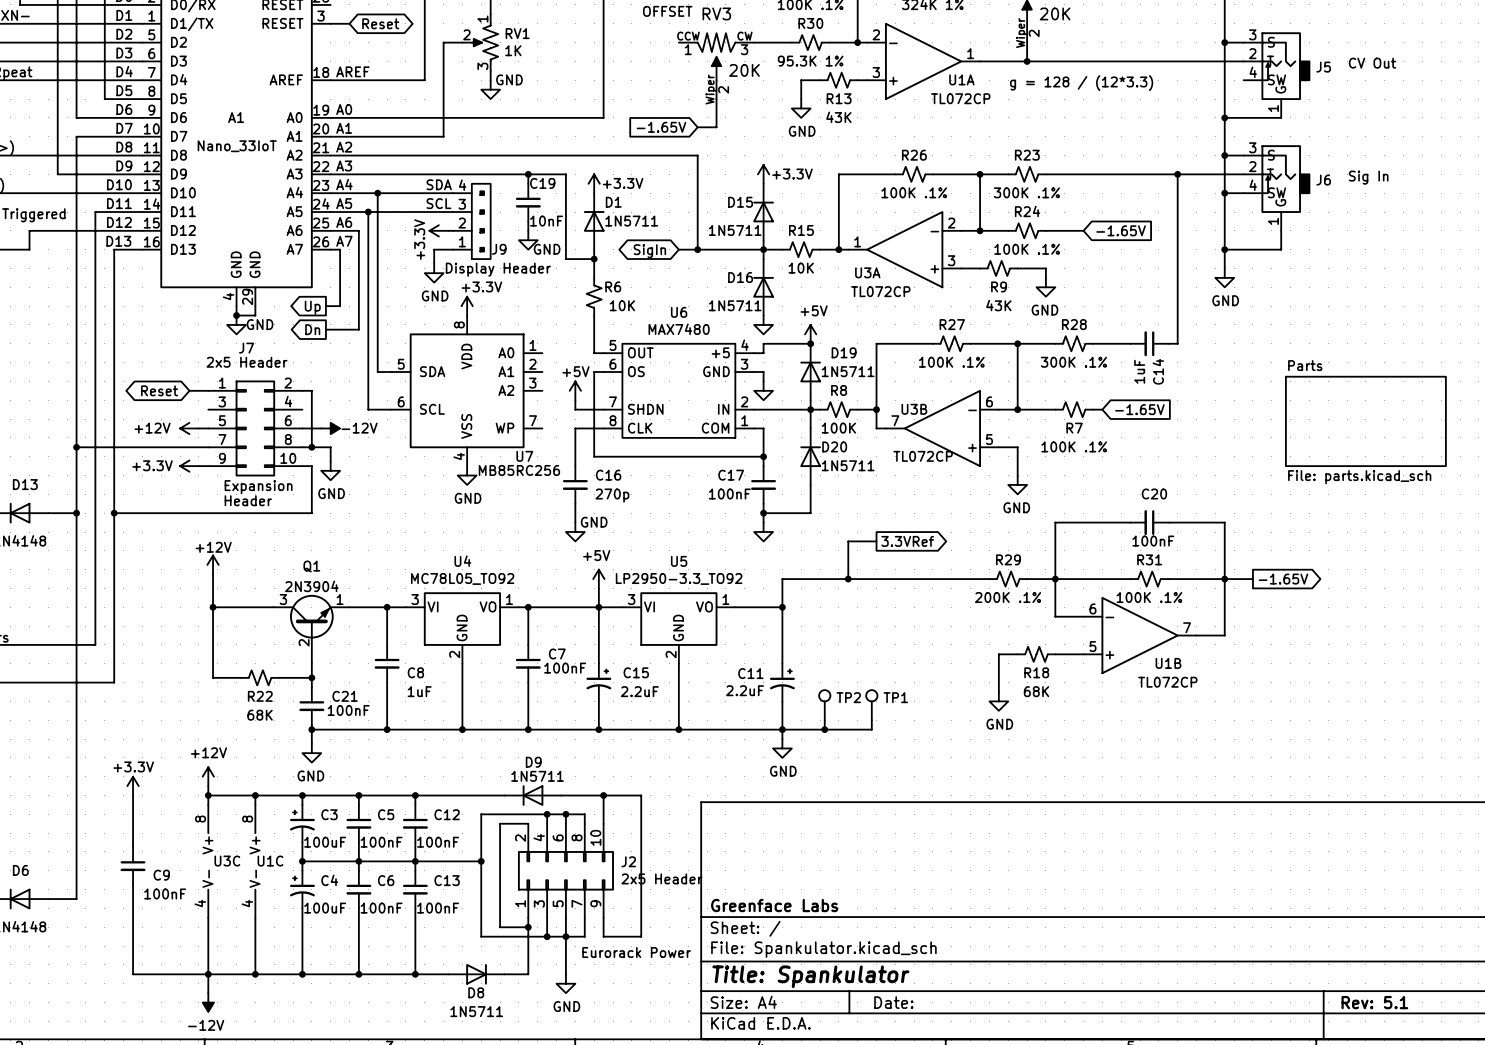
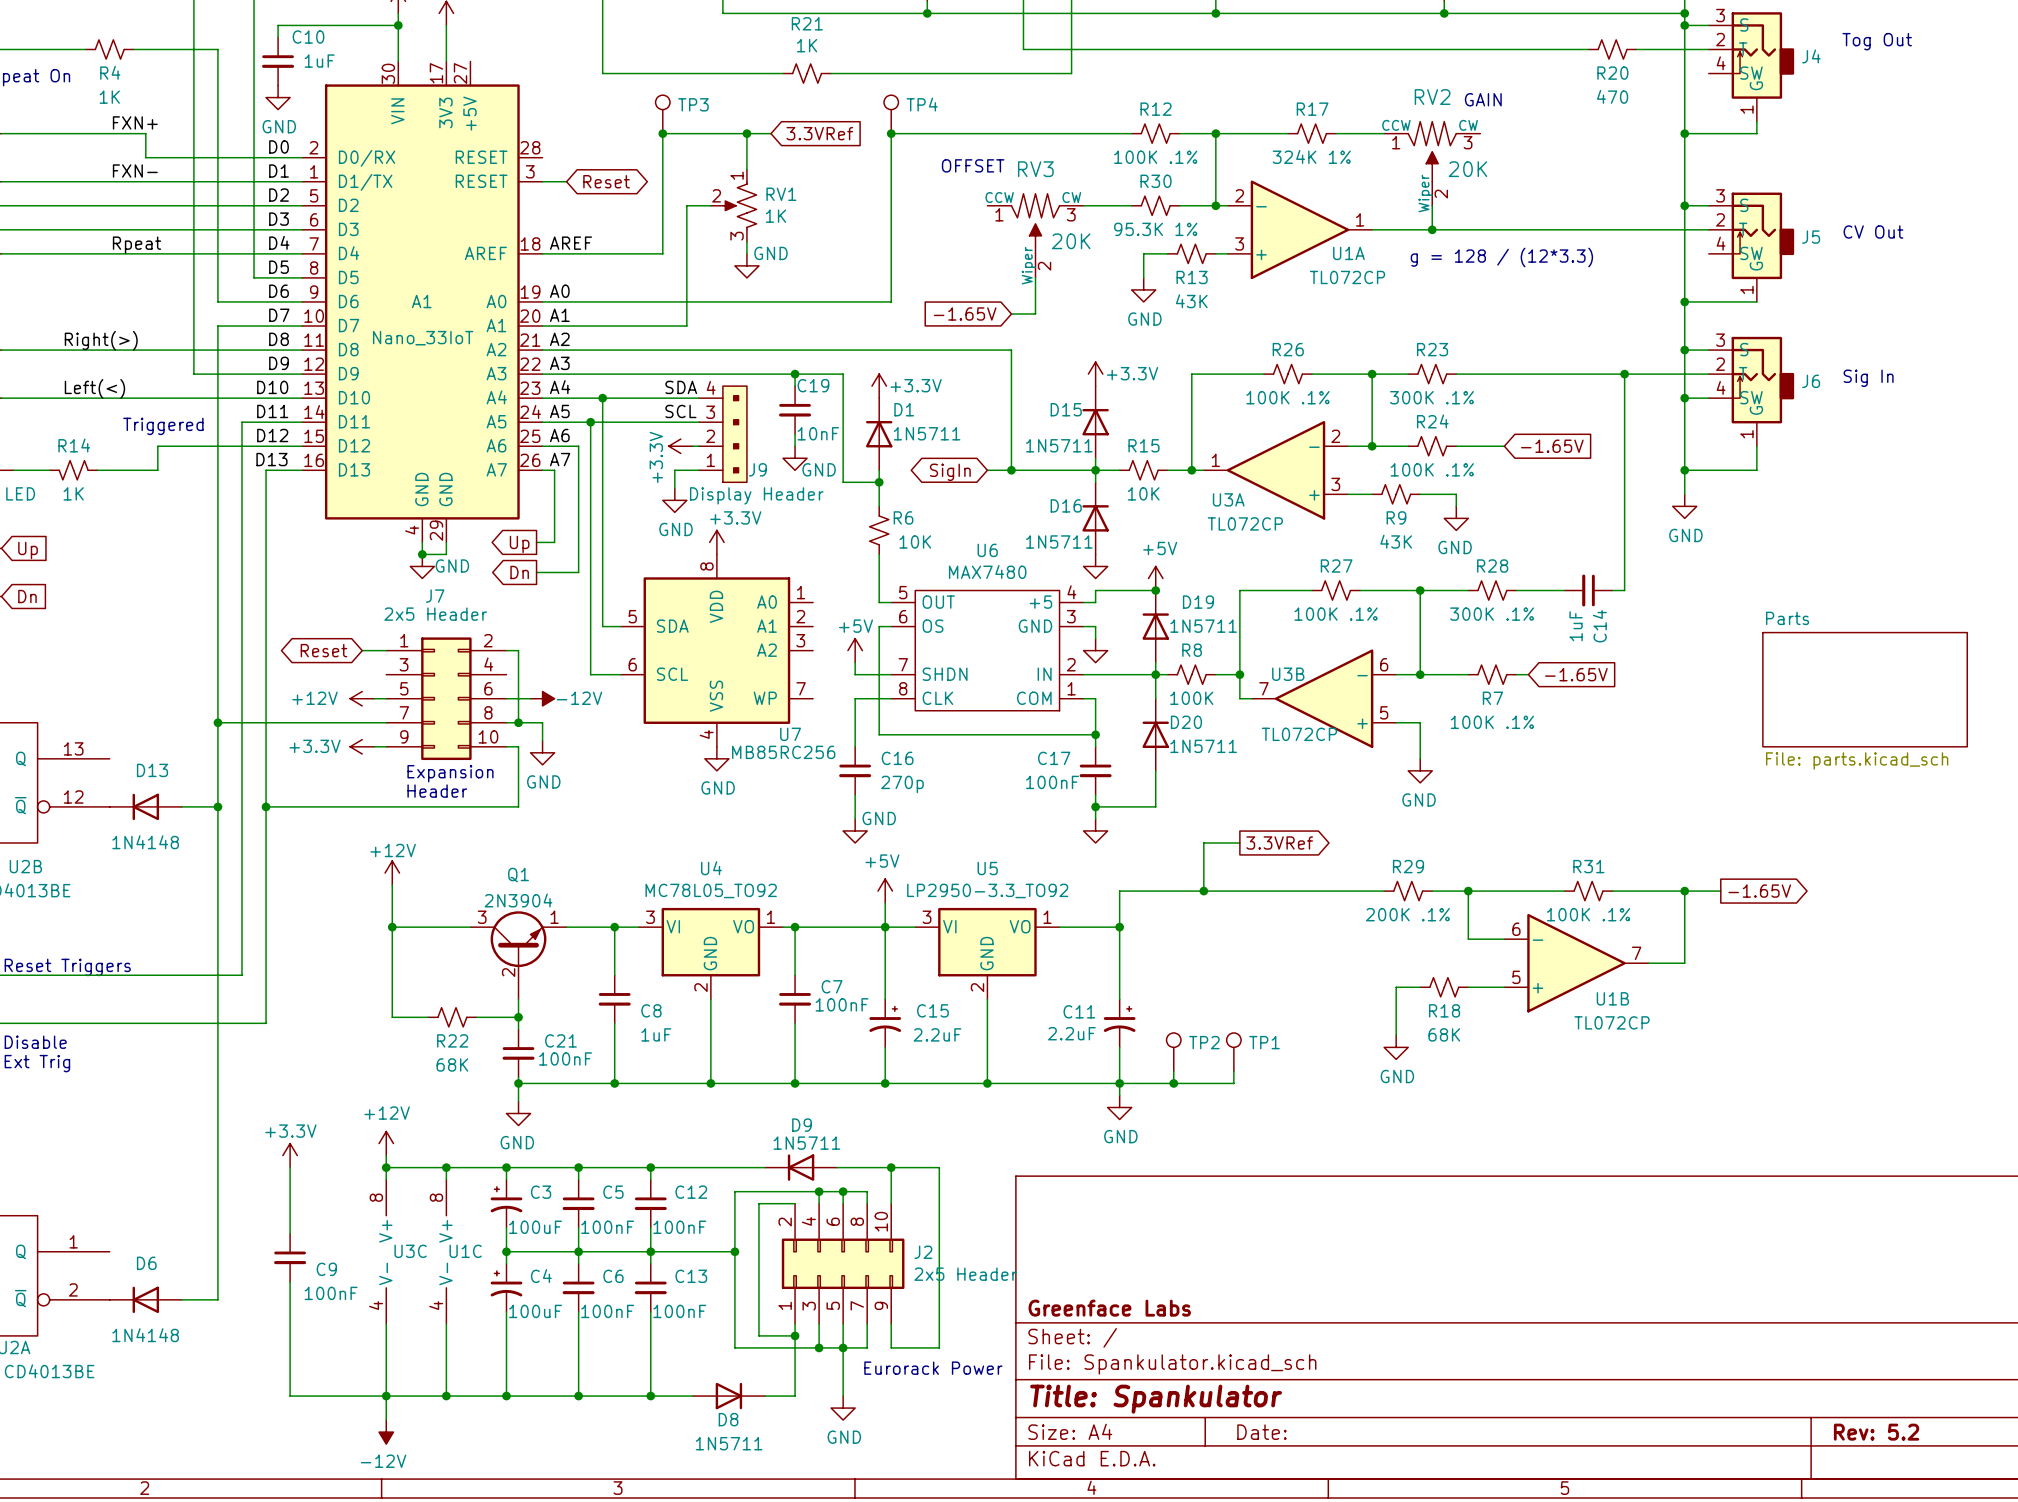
wire: (1130, 522) (1055, 522) (1055, 579) -> none
C20: 100nF (1149, 522) -> none
wire: (1168, 522) (1224, 522) (1224, 579) -> none
title block: Rev: 5.1 (1374, 1002) -> Rev: 5.2 (1876, 1432)

